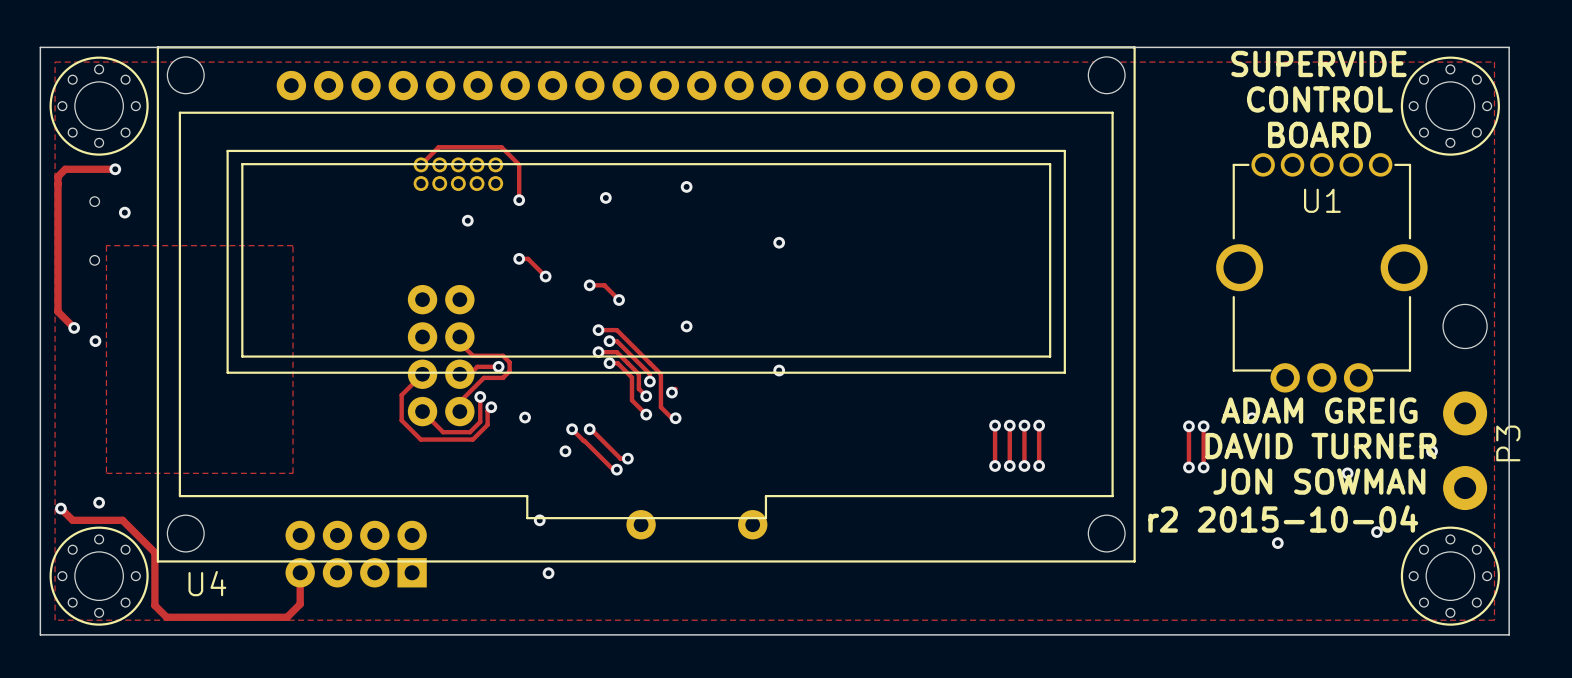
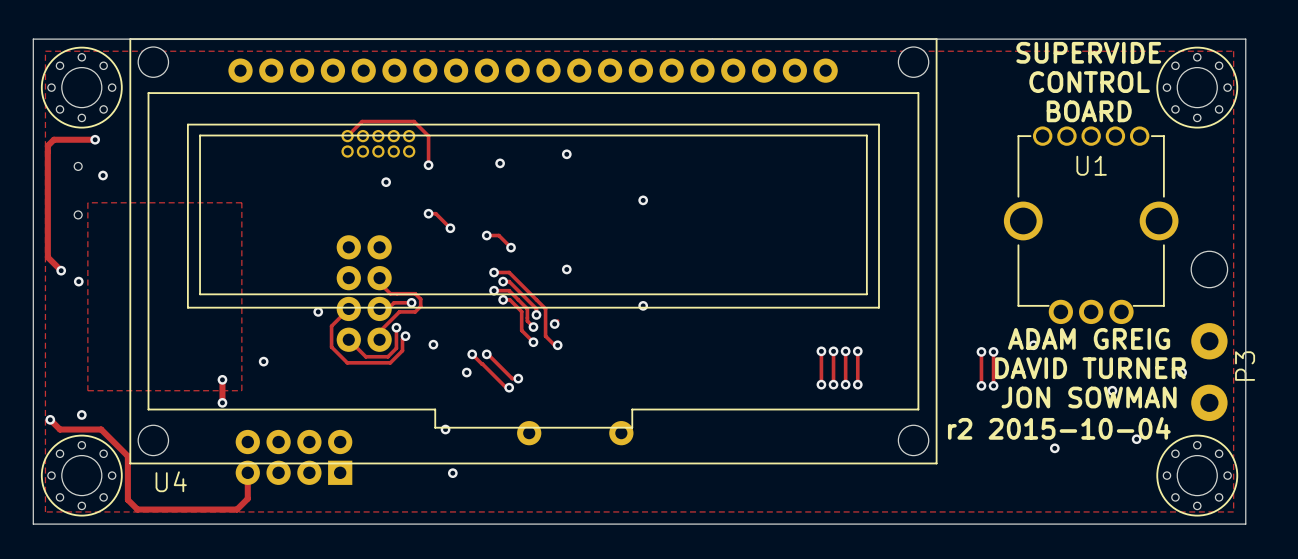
via: none -> (318, 311)
via: none -> (263, 361)
track: none -> (222, 379) (222, 402)
via: none -> (222, 379)
via: none -> (222, 402)

